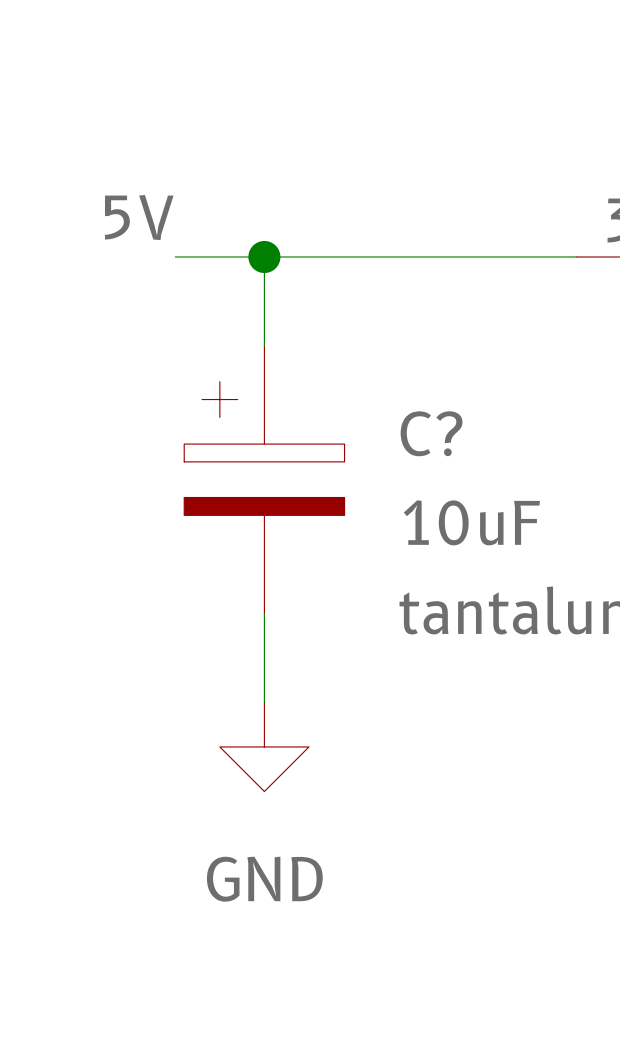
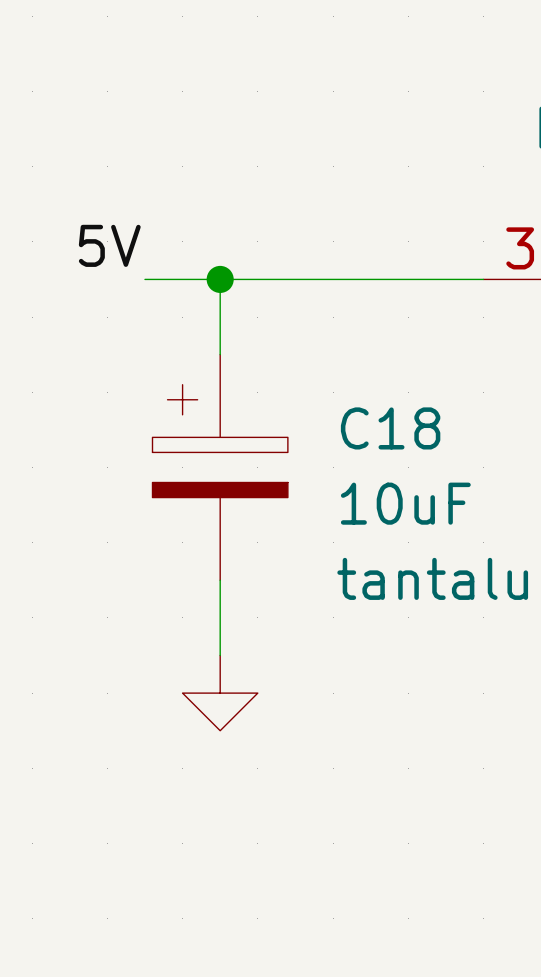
C? name: C? (431, 433) -> C18 (390, 428)
power symbol text: GND (264, 879) -> none

